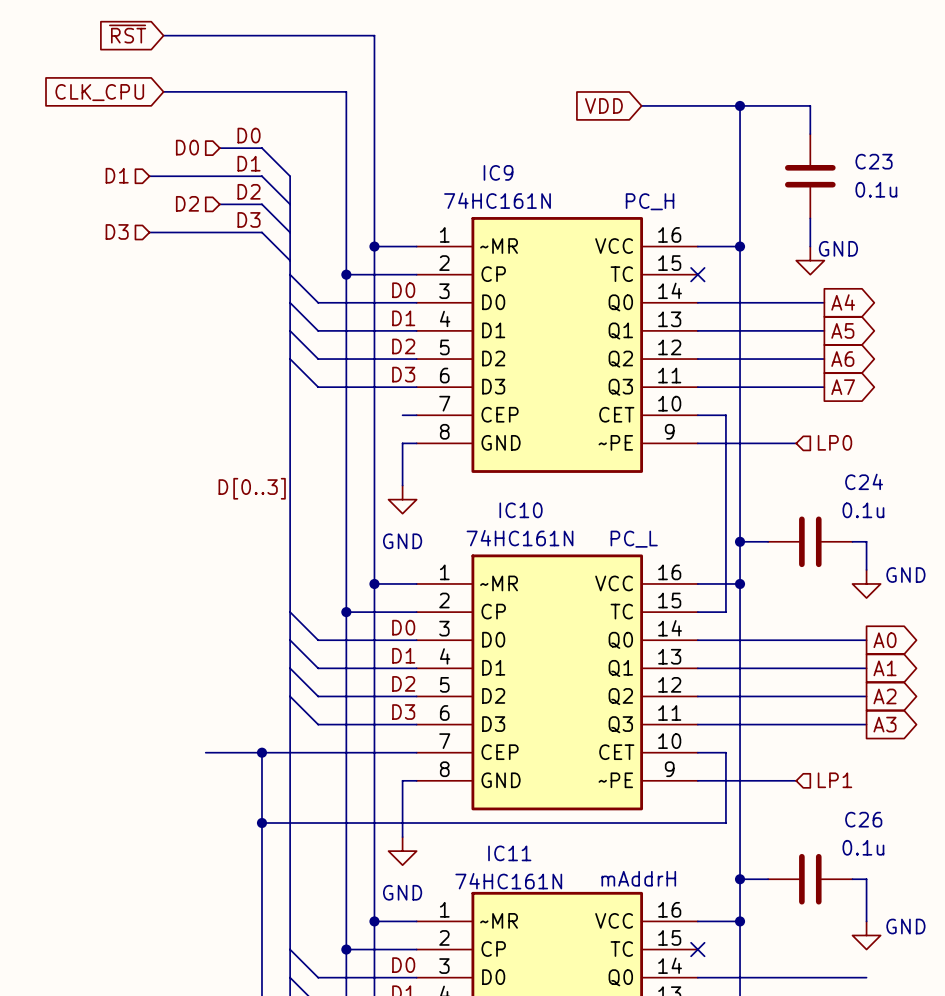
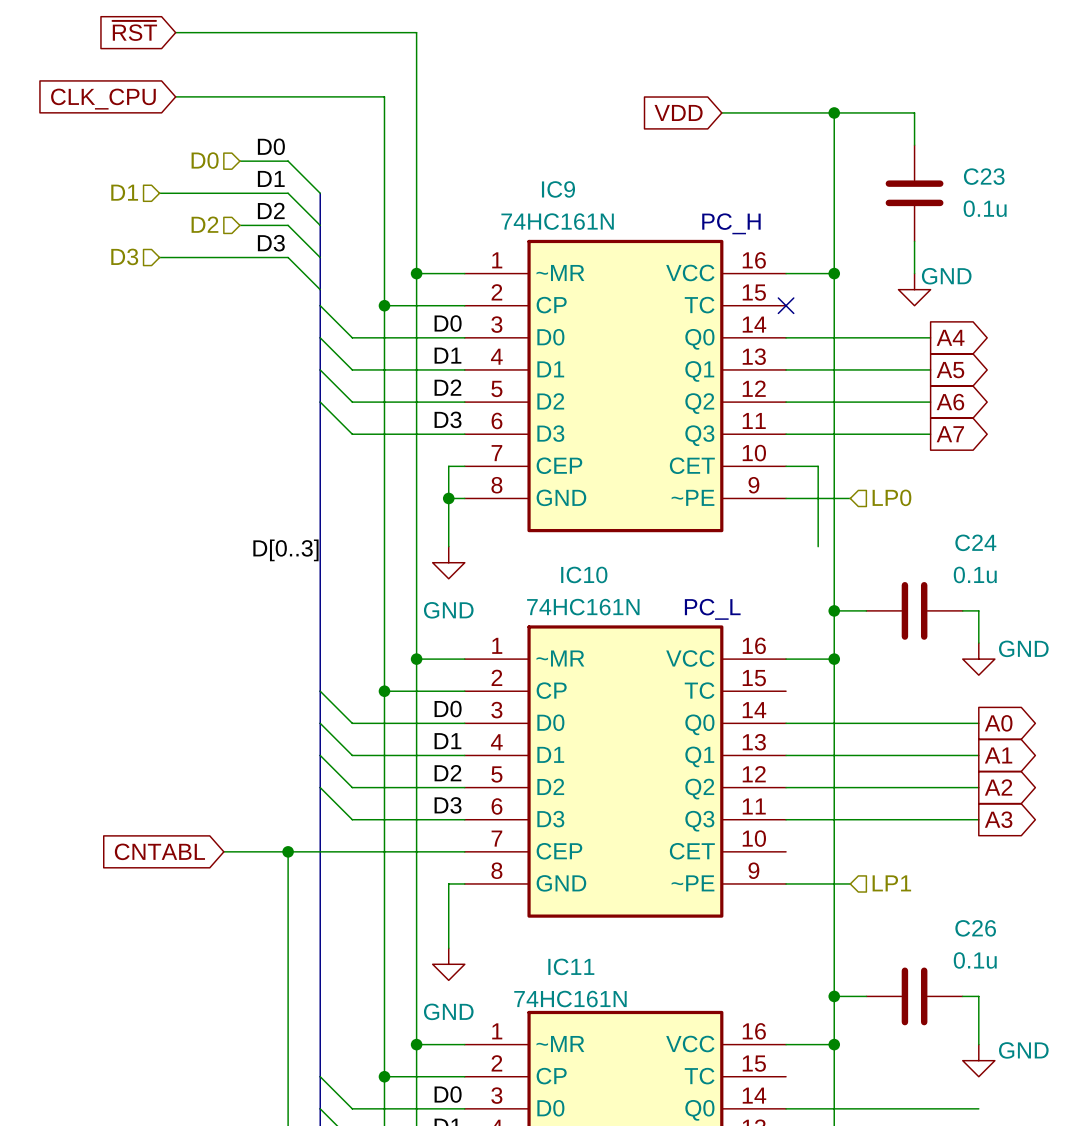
wire: none -> (448, 466) (448, 498)
hierarchical label position: LP0 (834, 442) -> LP0 (891, 497)
junction: none -> (448, 498)
wire: (754, 443) (796, 443) -> none
wire: (725, 485) (725, 612) (697, 612) -> none
global label: none -> CNTABL (159, 851)
wire: (697, 752) (725, 752) (725, 823) (261, 823) -> none
wire: (754, 780) (796, 780) -> none
hierarchical label position: LP1 (834, 780) -> LP1 (891, 883)
junction: (261, 823) -> none
text: mAddrH (638, 878) -> none
no-connect mark: (697, 949) -> none

